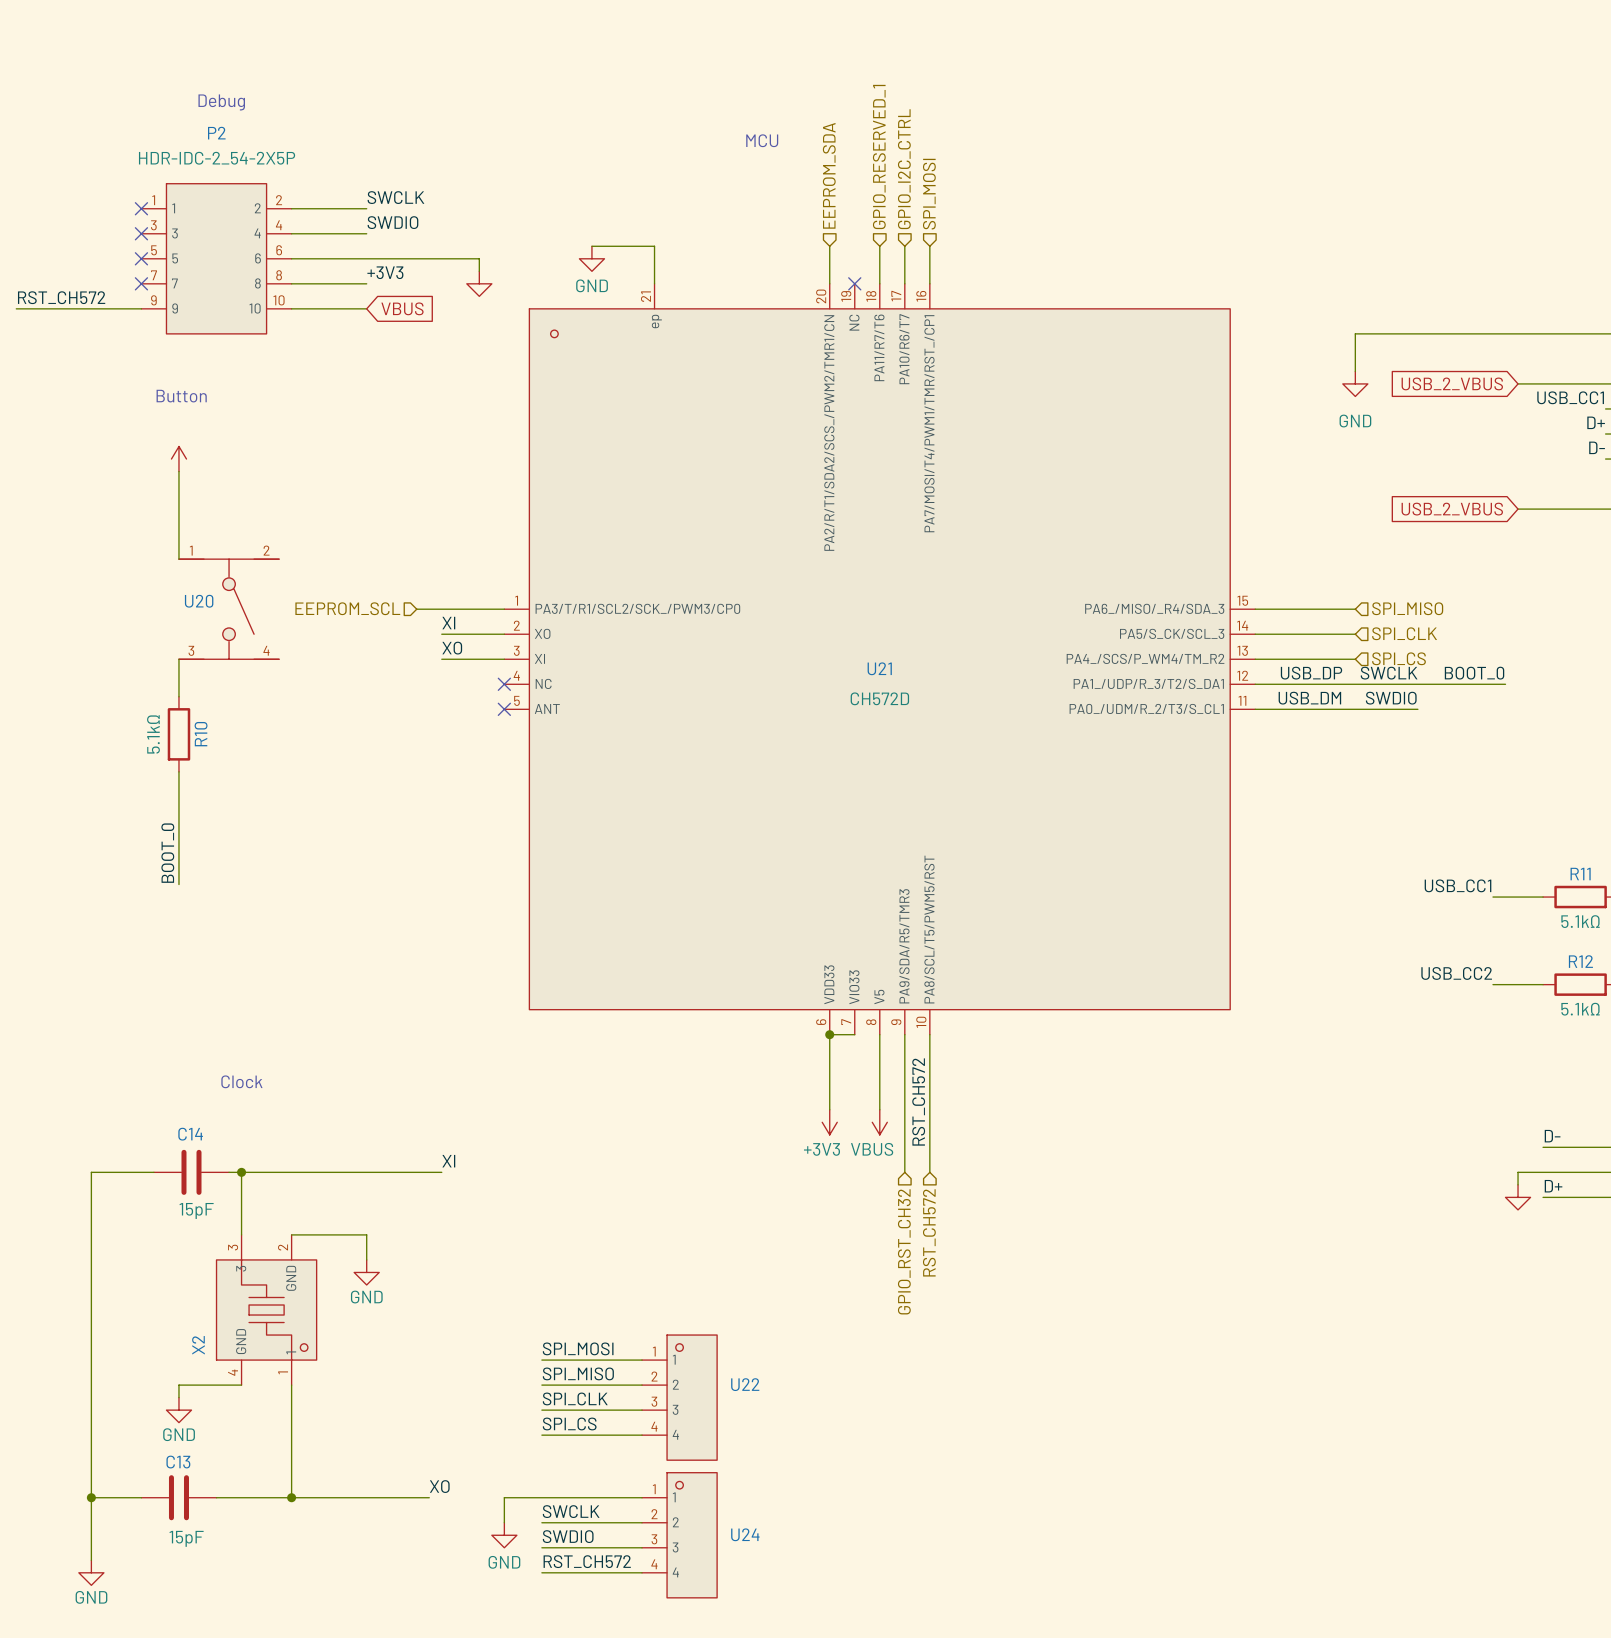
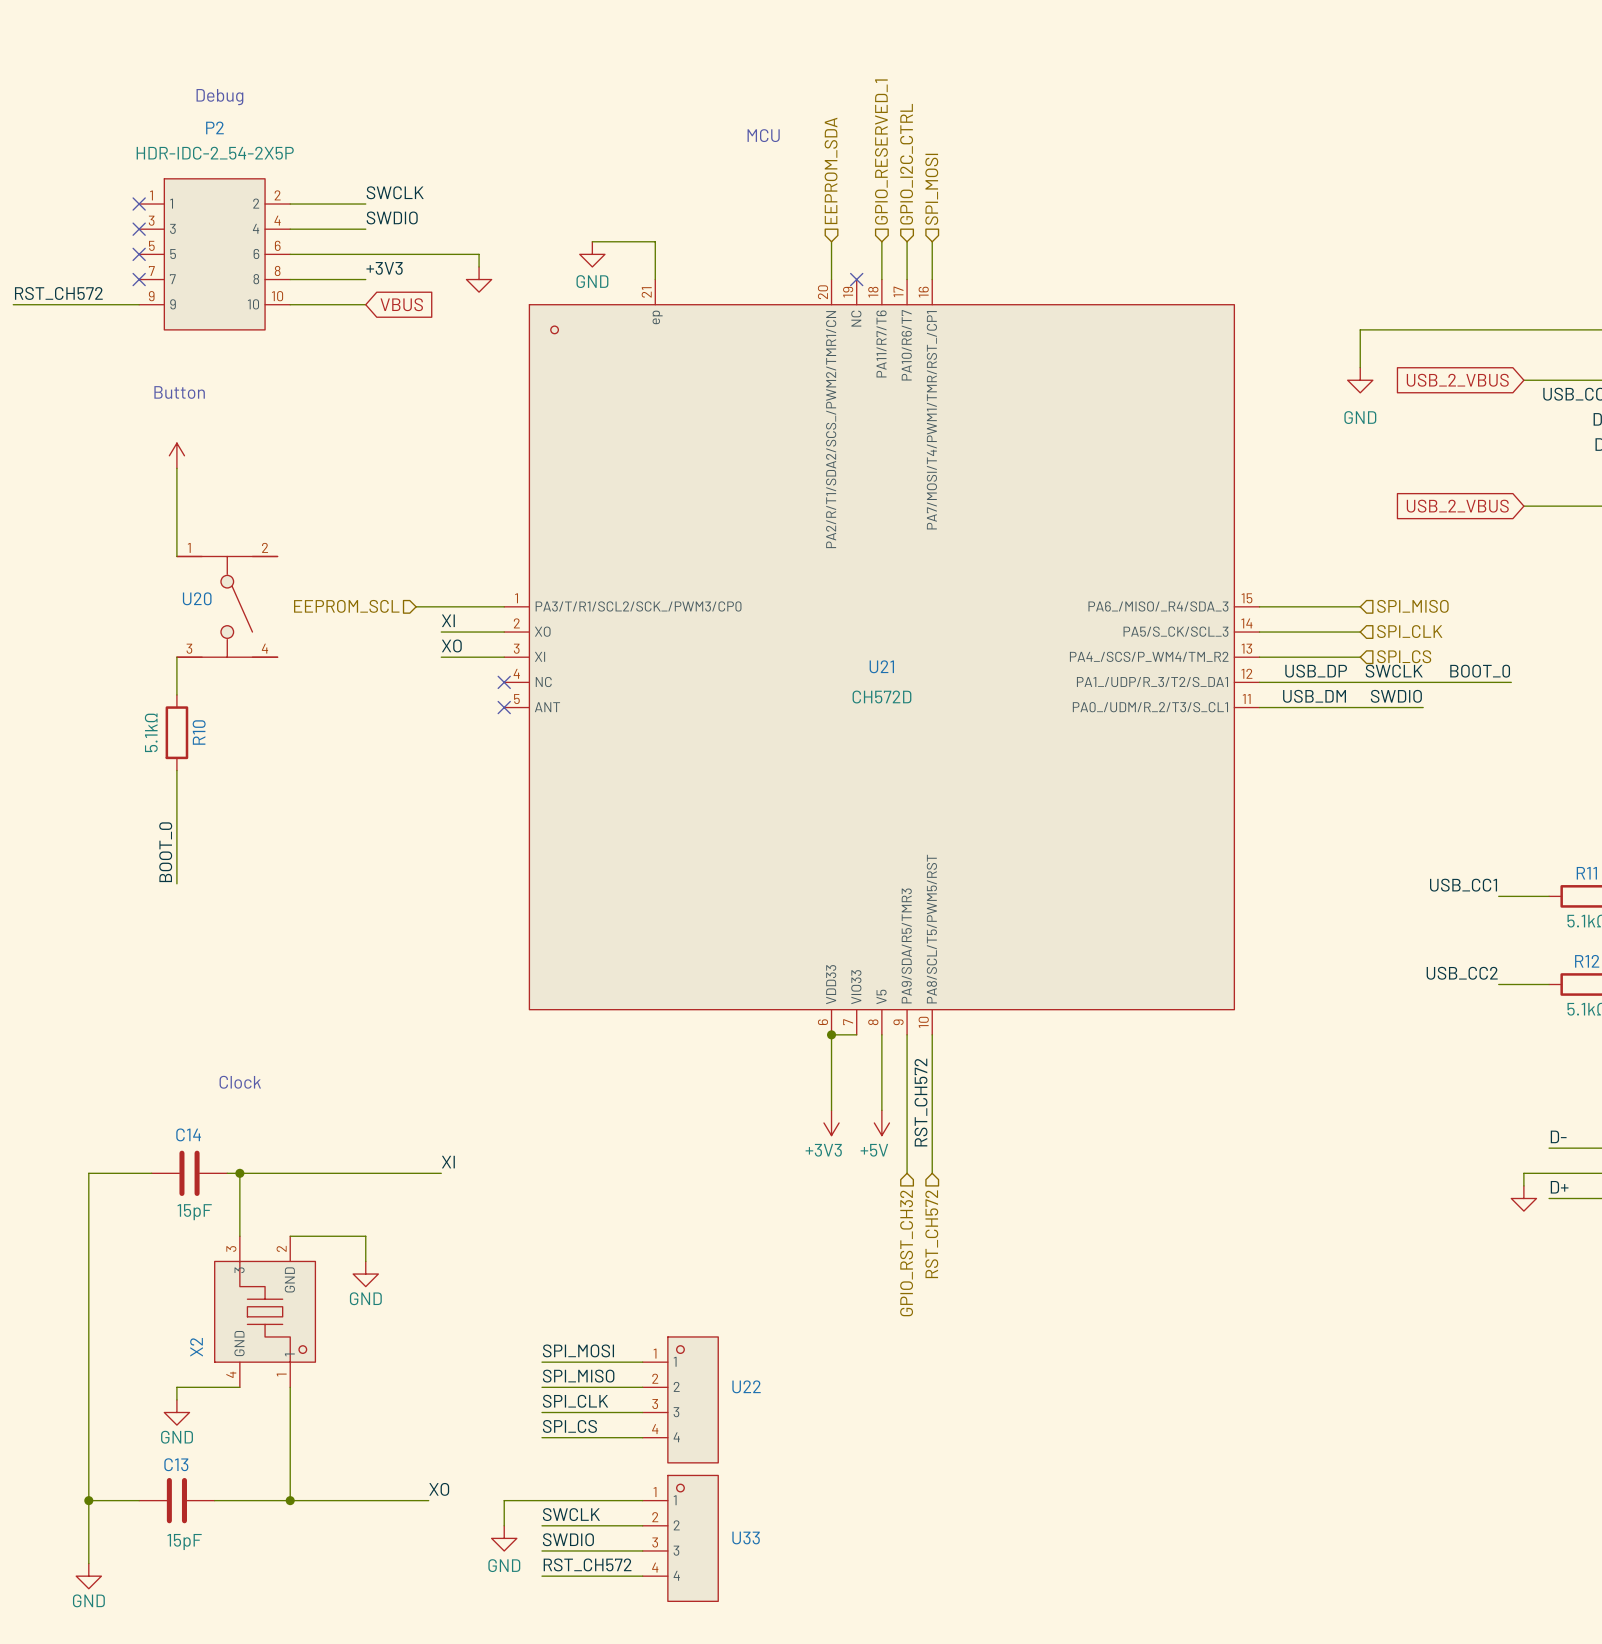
power symbol: VBUS (879, 1122) -> +5V (881, 1122)
U24 name: U24 (745, 1534) -> U33 (746, 1537)

